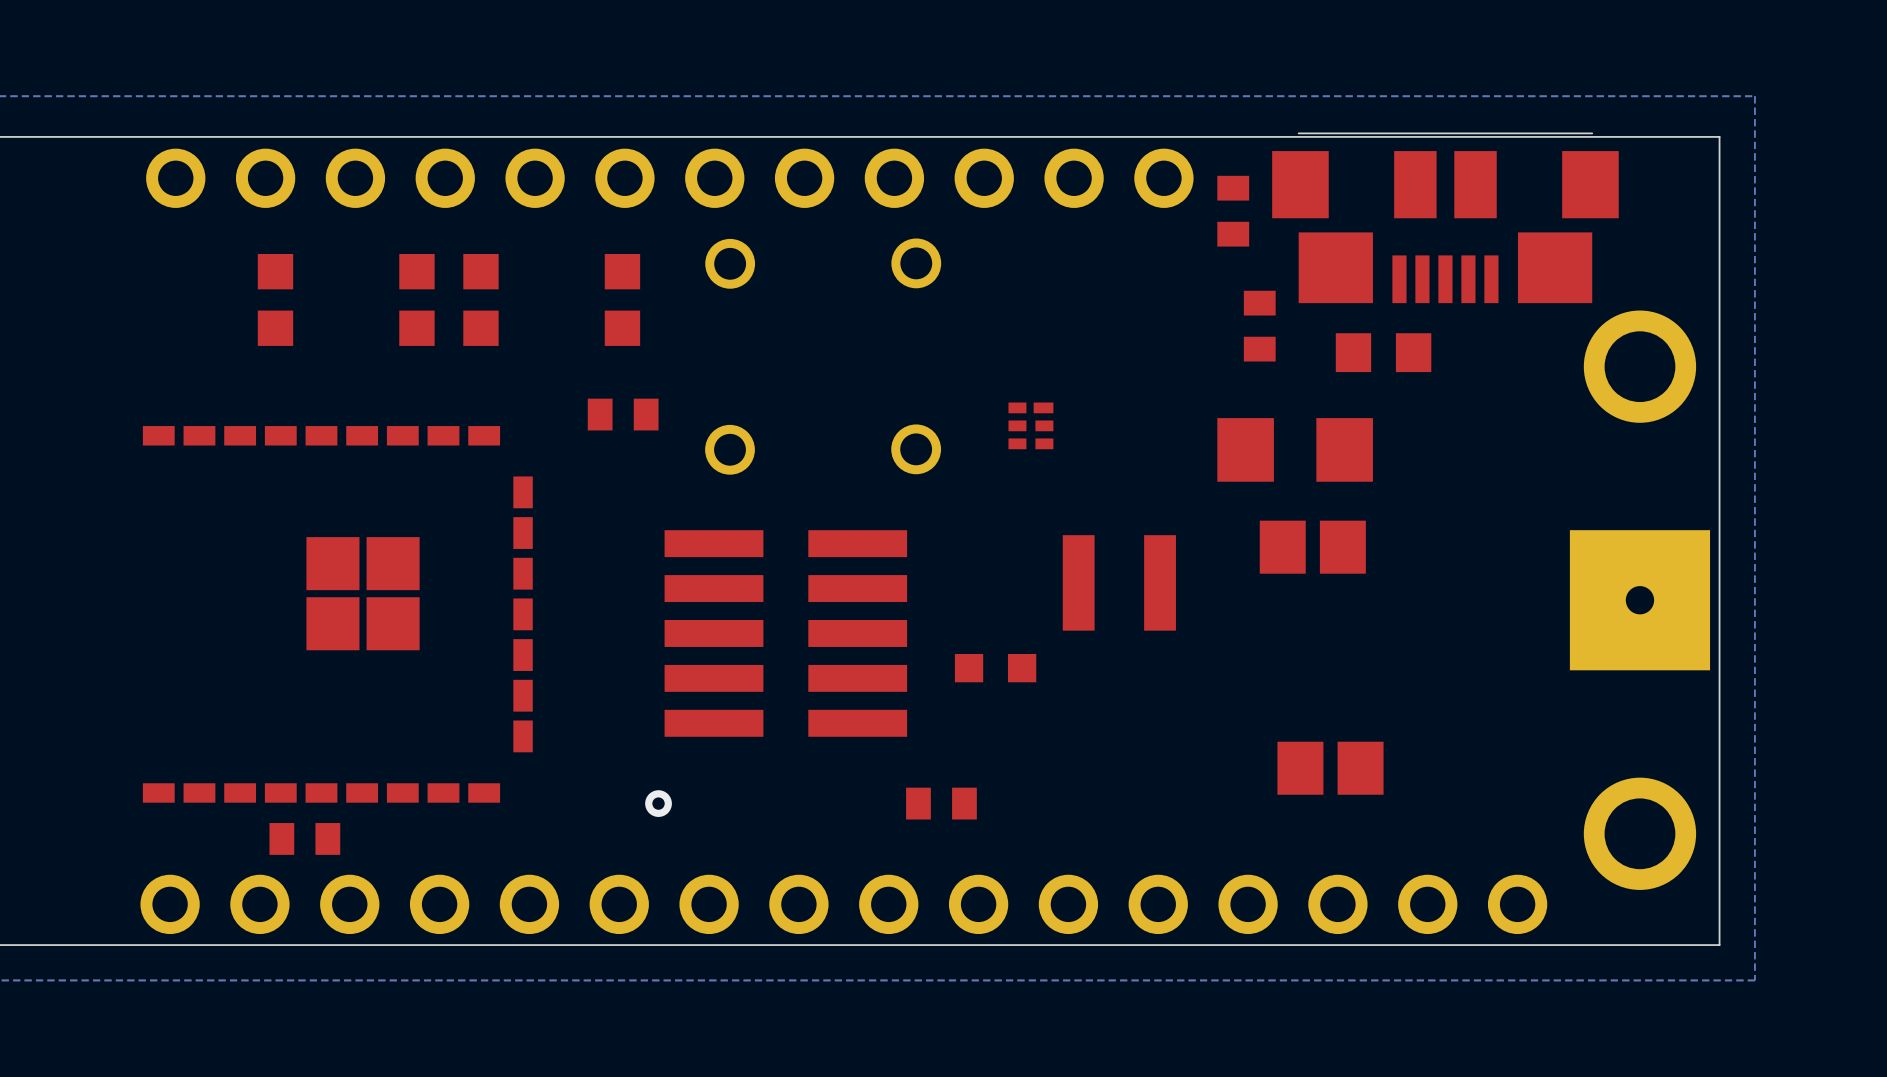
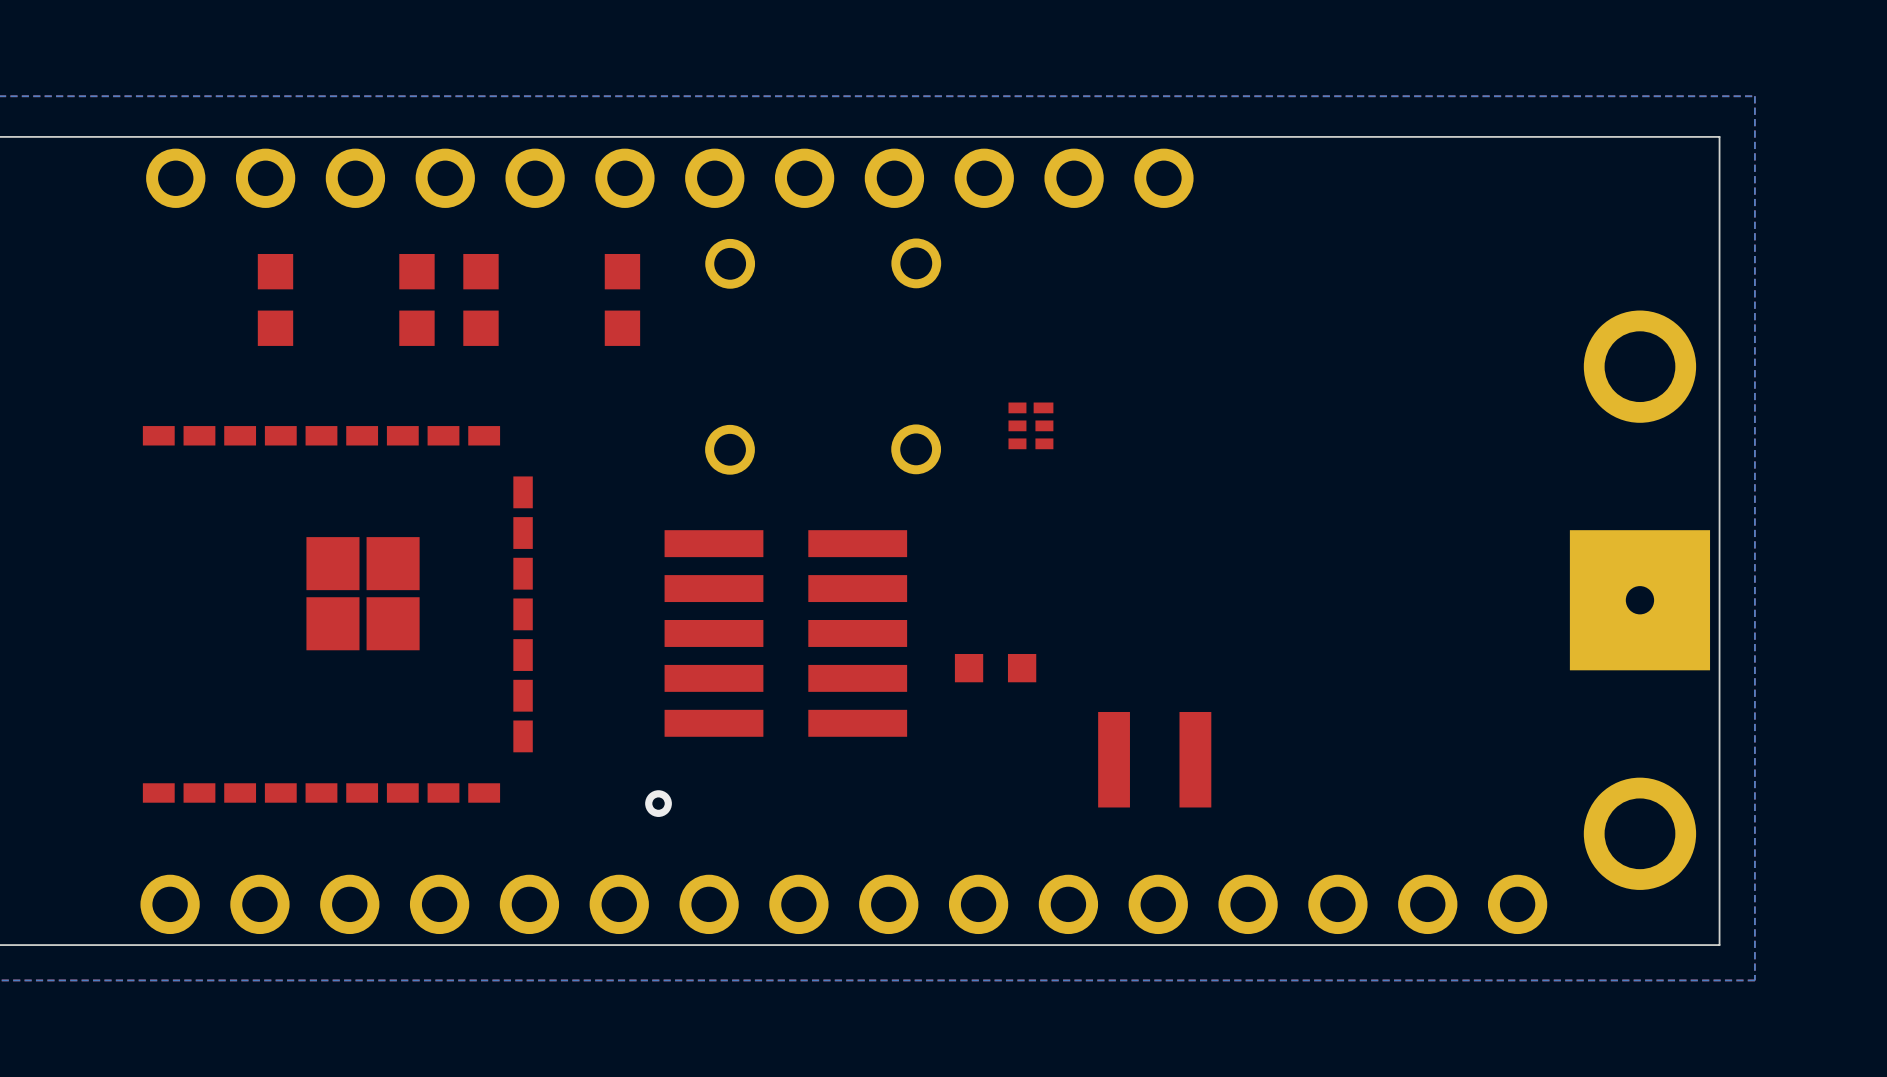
part: (1233, 211) -> none
part: (1445, 218) -> none
part: (1259, 326) -> none
part: (1383, 352) -> none
part: (623, 414) -> none
part: (1295, 449) -> none
part: (1312, 547) -> none
part position: (1119, 582) -> (1154, 759)
part: (1330, 768) -> none
part: (941, 803) -> none
part: (304, 838) -> none

